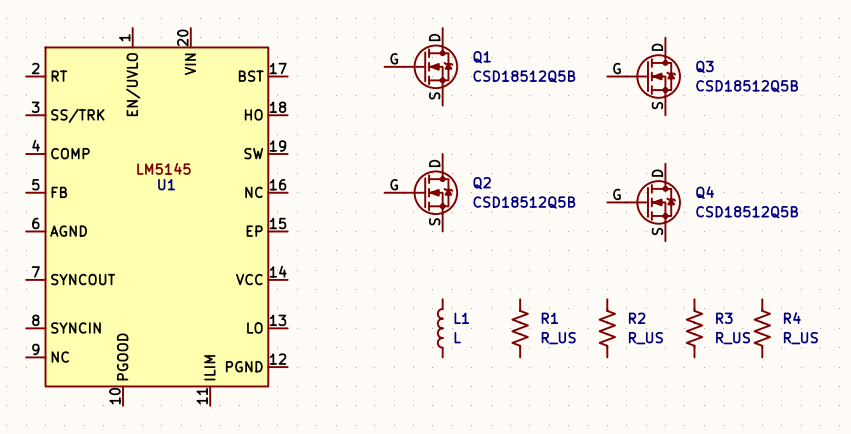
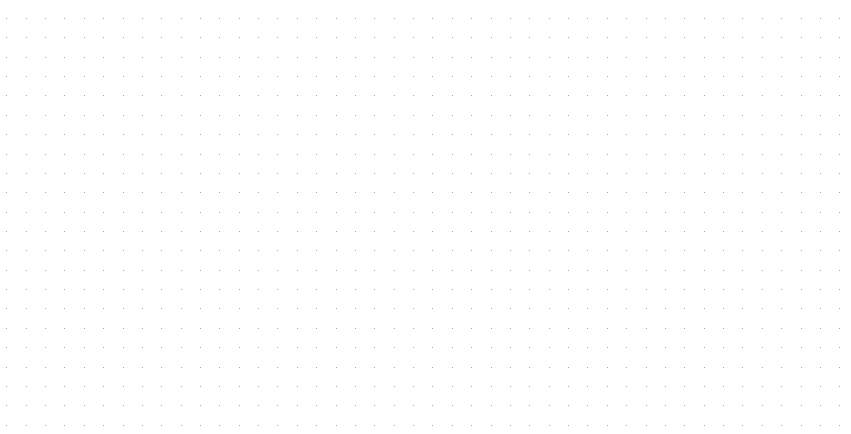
Q1: CSD18512Q5B (421, 66) -> none
Q3: CSD18512Q5B (644, 76) -> none
Q2: CSD18512Q5B (421, 192) -> none
Q4: CSD18512Q5B (644, 202) -> none
U1: (156, 216) -> none
L1: L (440, 328) -> none
R1: R_US (520, 328) -> none
R2: R_US (607, 328) -> none
R3: R_US (694, 328) -> none
R4: R_US (762, 328) -> none

